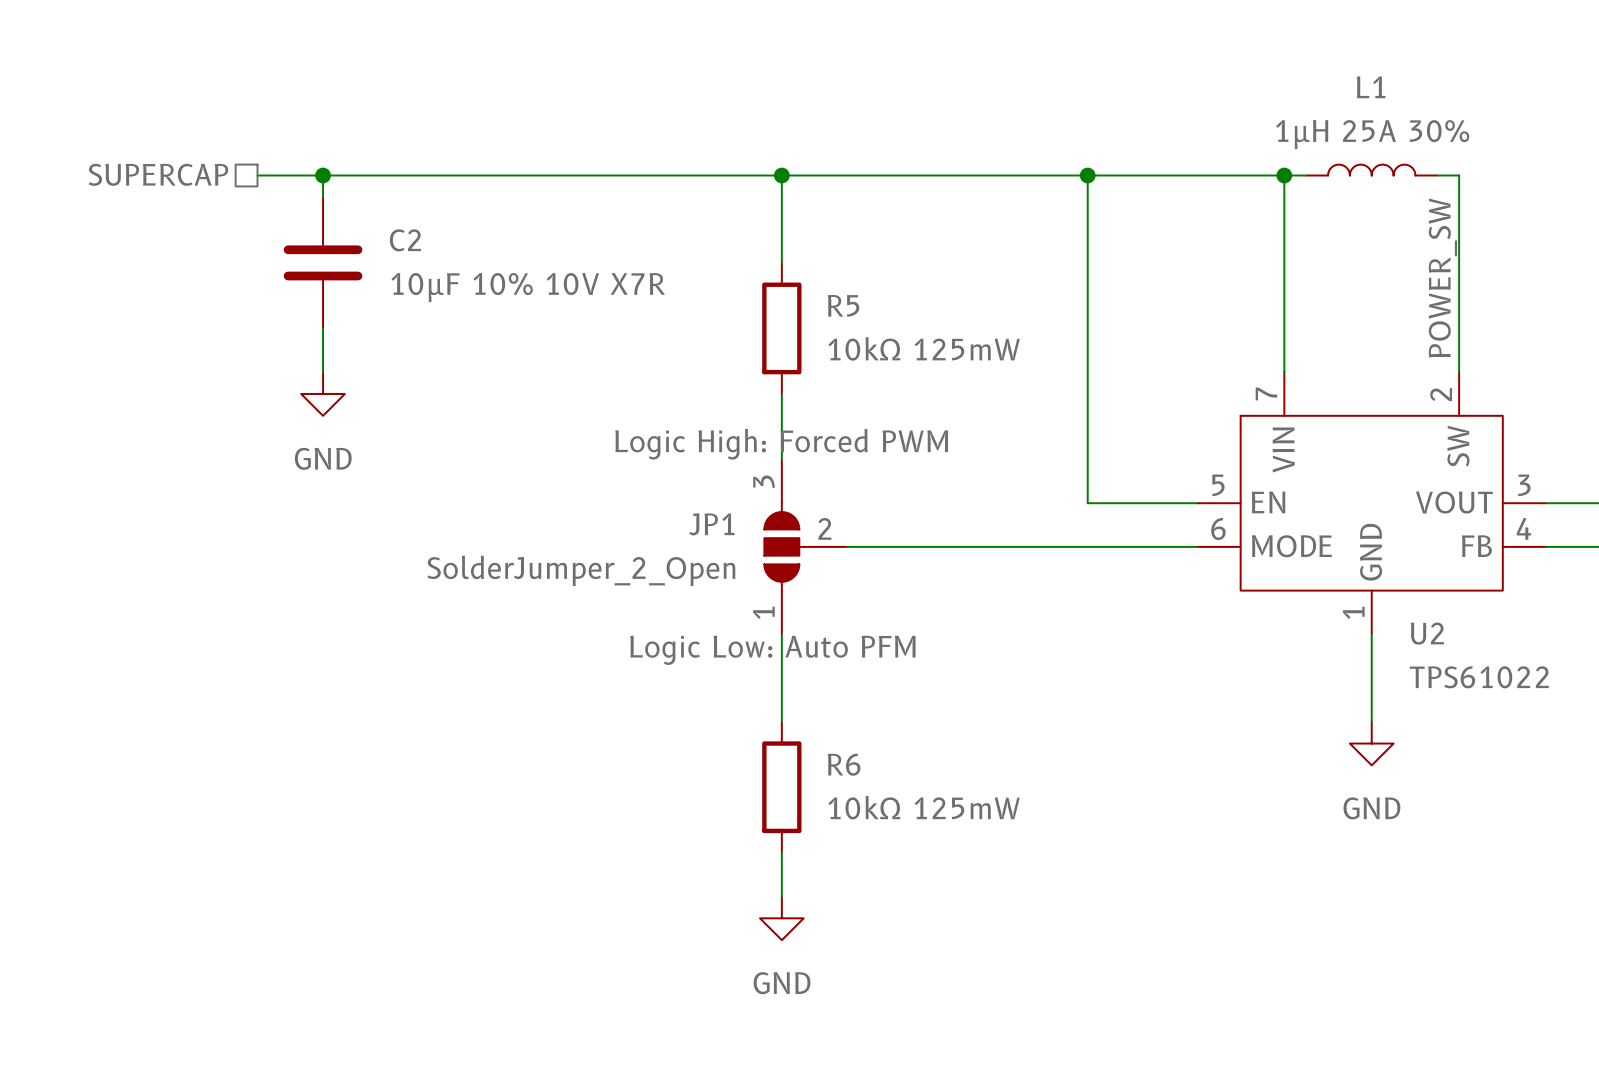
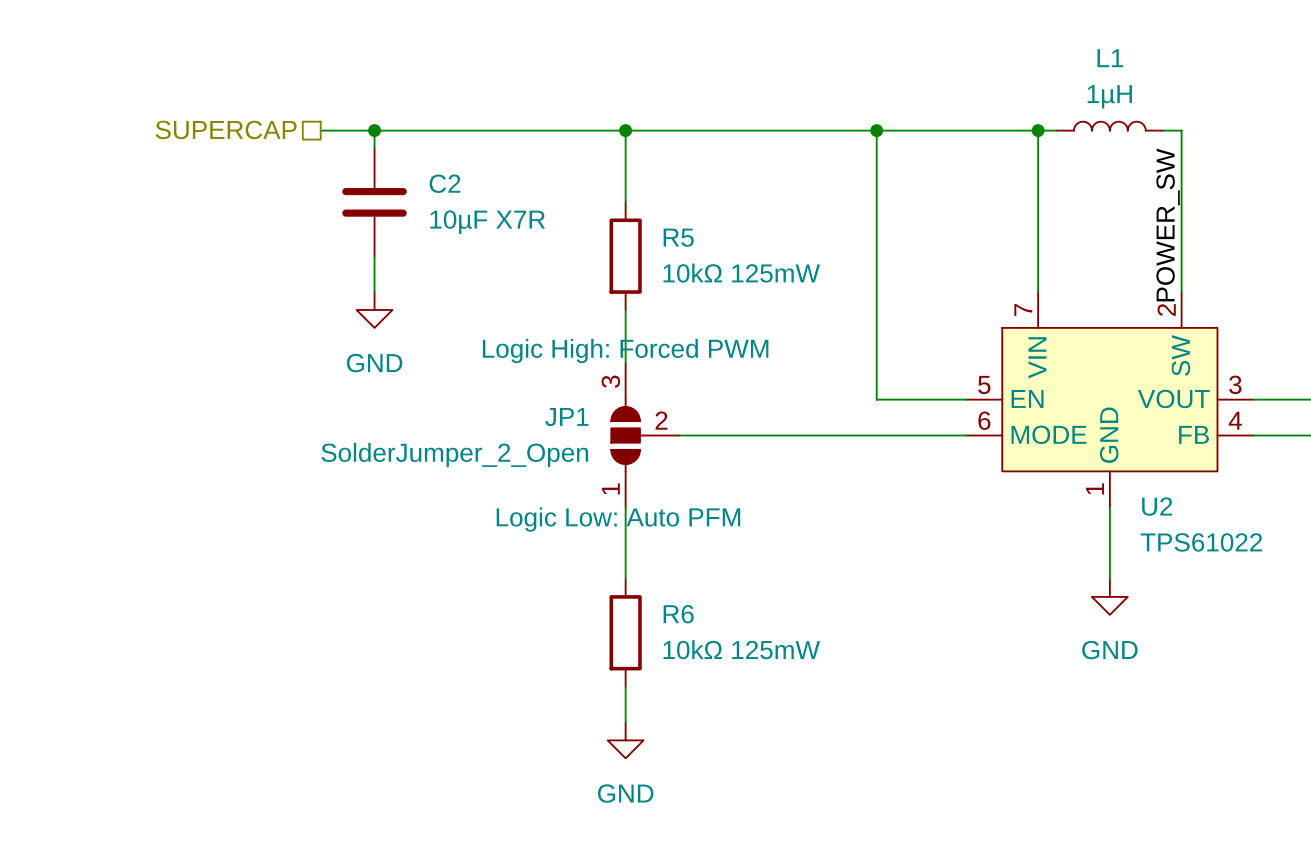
L1 value: 1µH 25A 30% (1372, 134) -> 1µH (1109, 96)
hierarchical label position: SUPERCAP (158, 174) -> SUPERCAP (226, 129)
wire: (257, 175) (410, 175) -> none
wire: (323, 175) (323, 197) -> (374, 130) (374, 148)
junction: (323, 175) -> none
junction: none -> (374, 130)
C2 position: (323, 262) -> (374, 202)
C2 value: 10µF 10% 10V X7R (528, 287) -> 10µF X7R (487, 222)
wire: (323, 328) (323, 372) -> (374, 256) (374, 292)
power symbol position: GND (323, 393) -> GND (374, 309)

